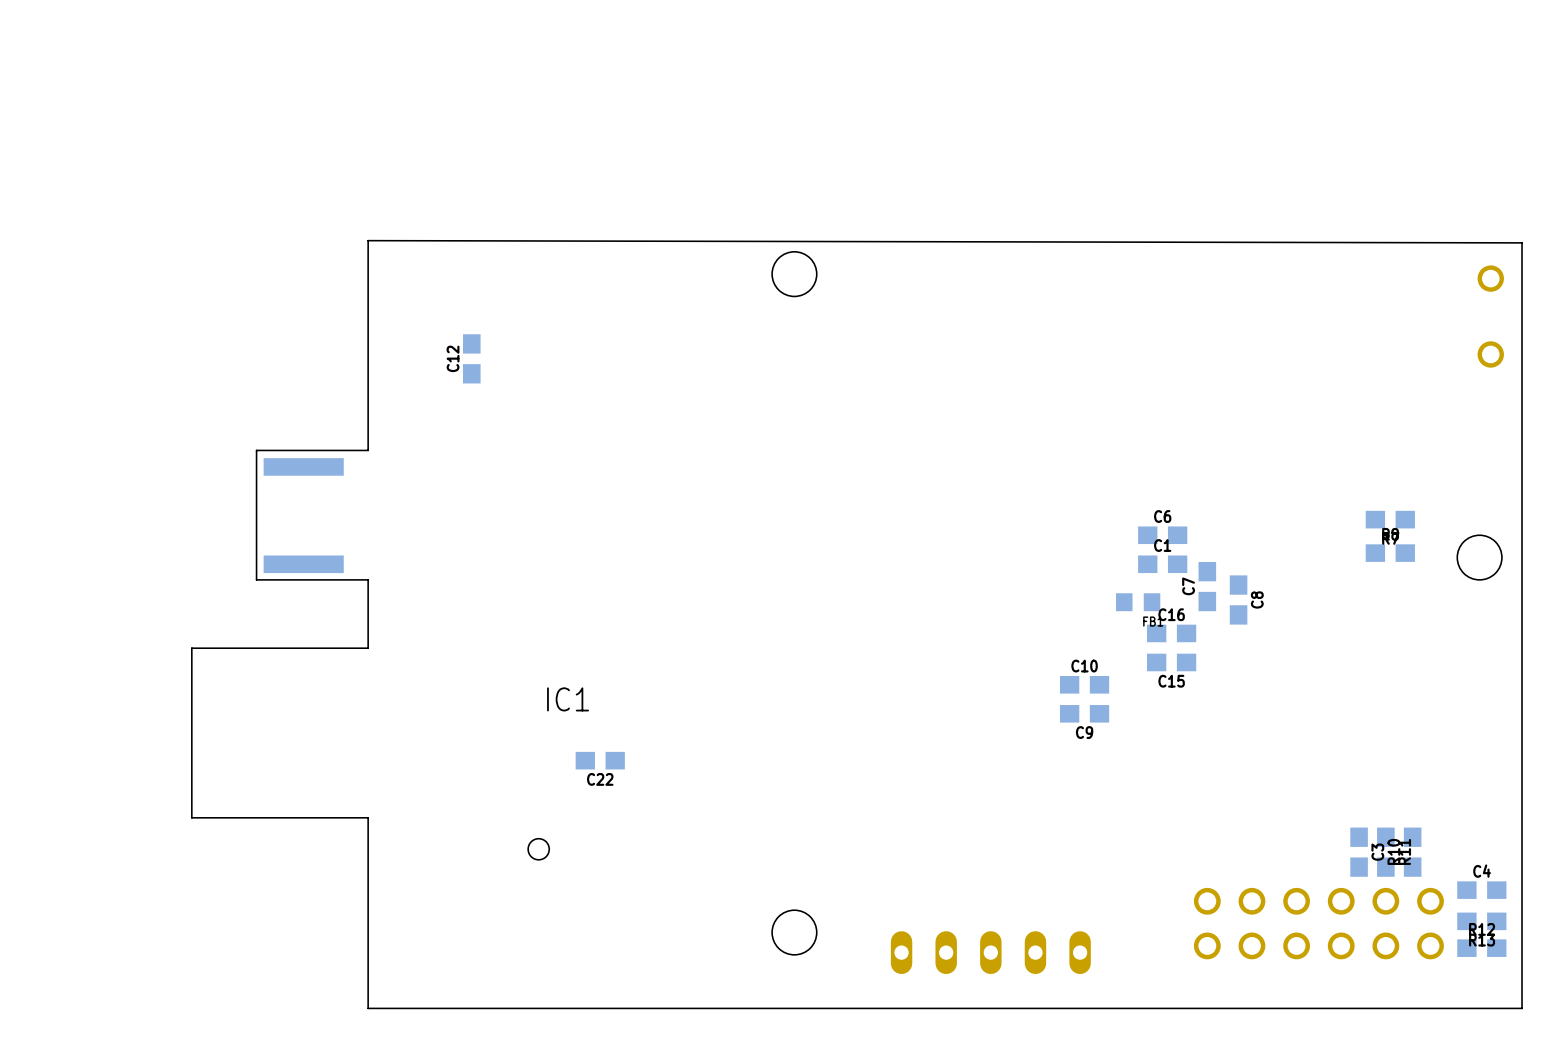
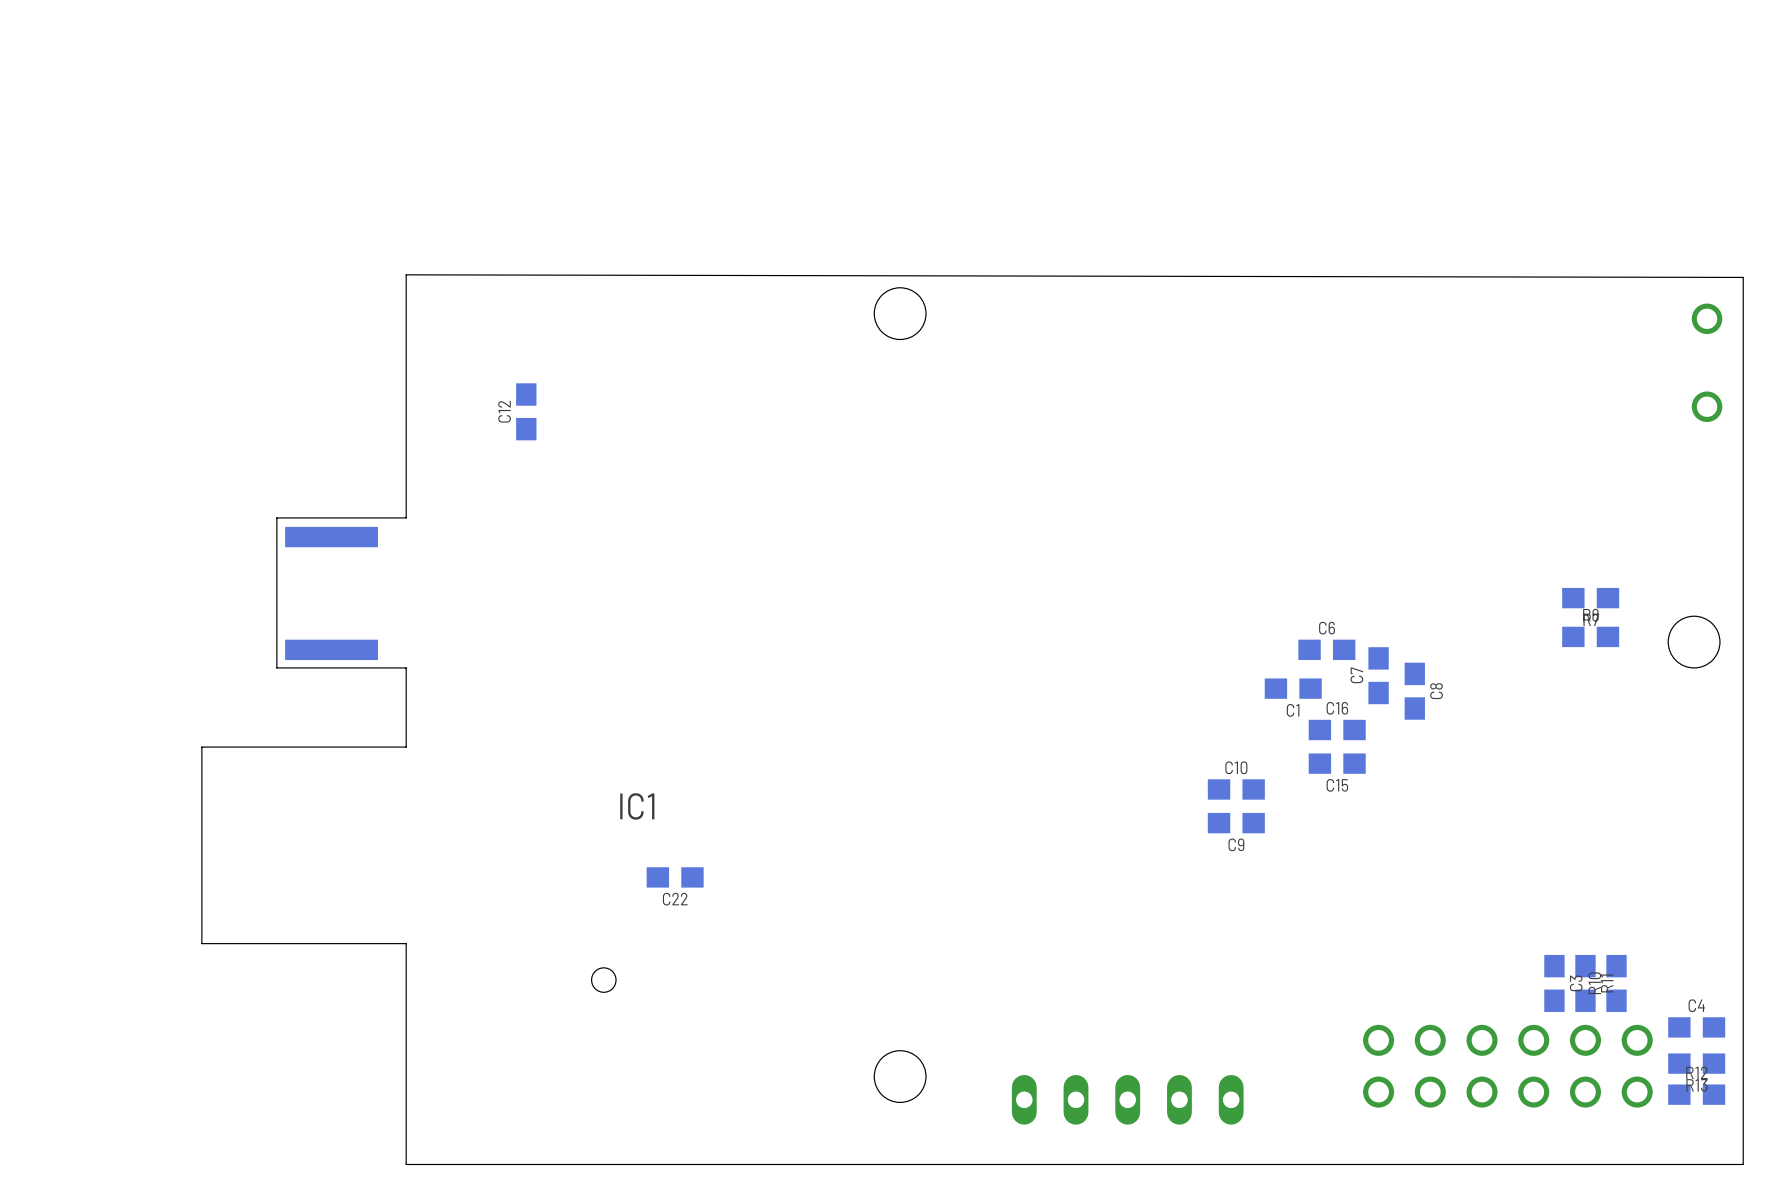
C6: (1162, 535) -> none
C1 name: C1 (1162, 545) -> C6 (1327, 628)
C1: none -> (1293, 688)
FB1: (1138, 602) -> none

